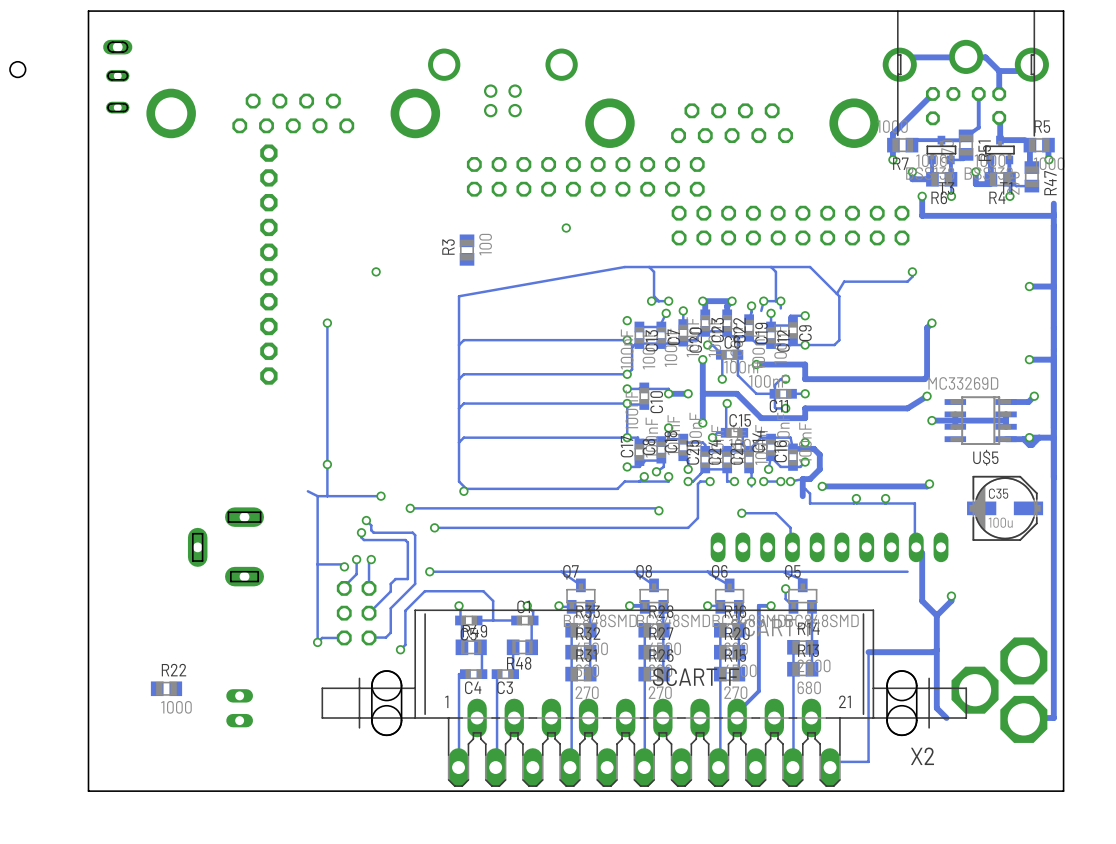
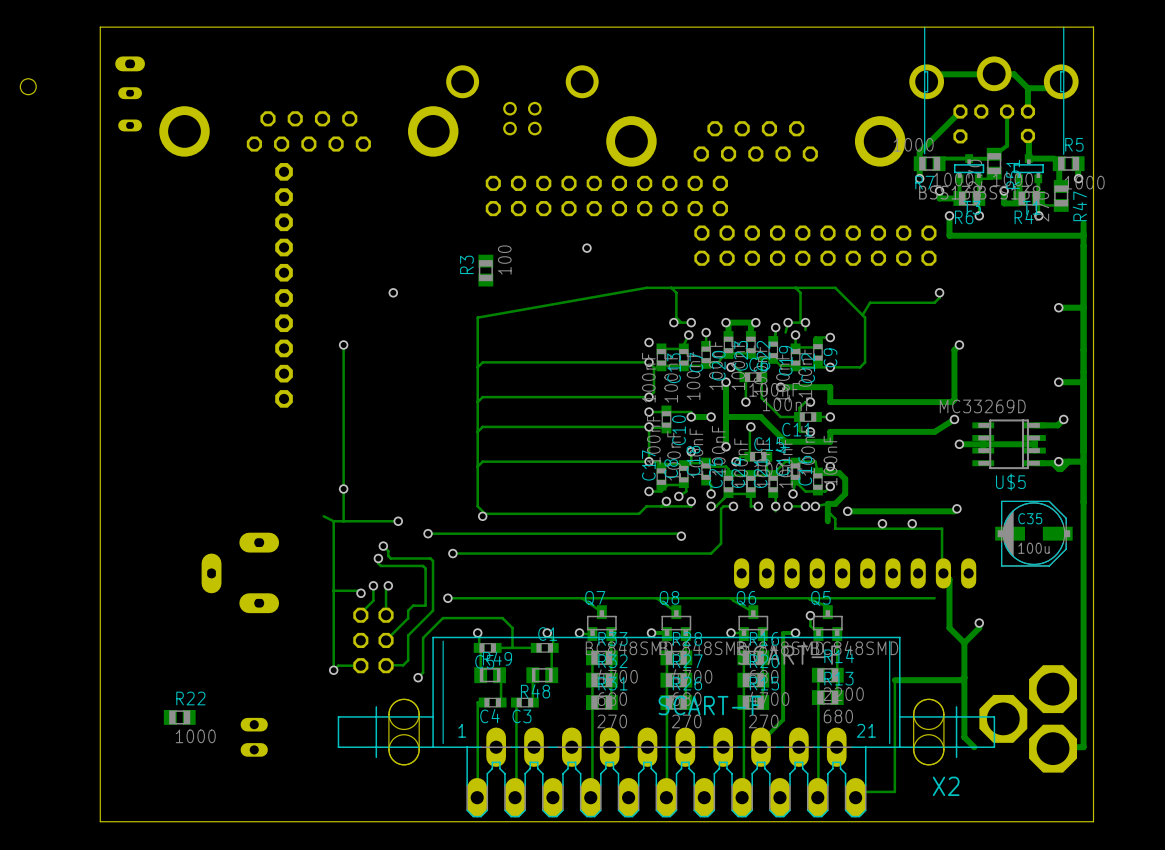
track: (741, 513) (775, 513) (790, 527) (790, 545) (792, 547) -> none
via: (741, 513) -> none

